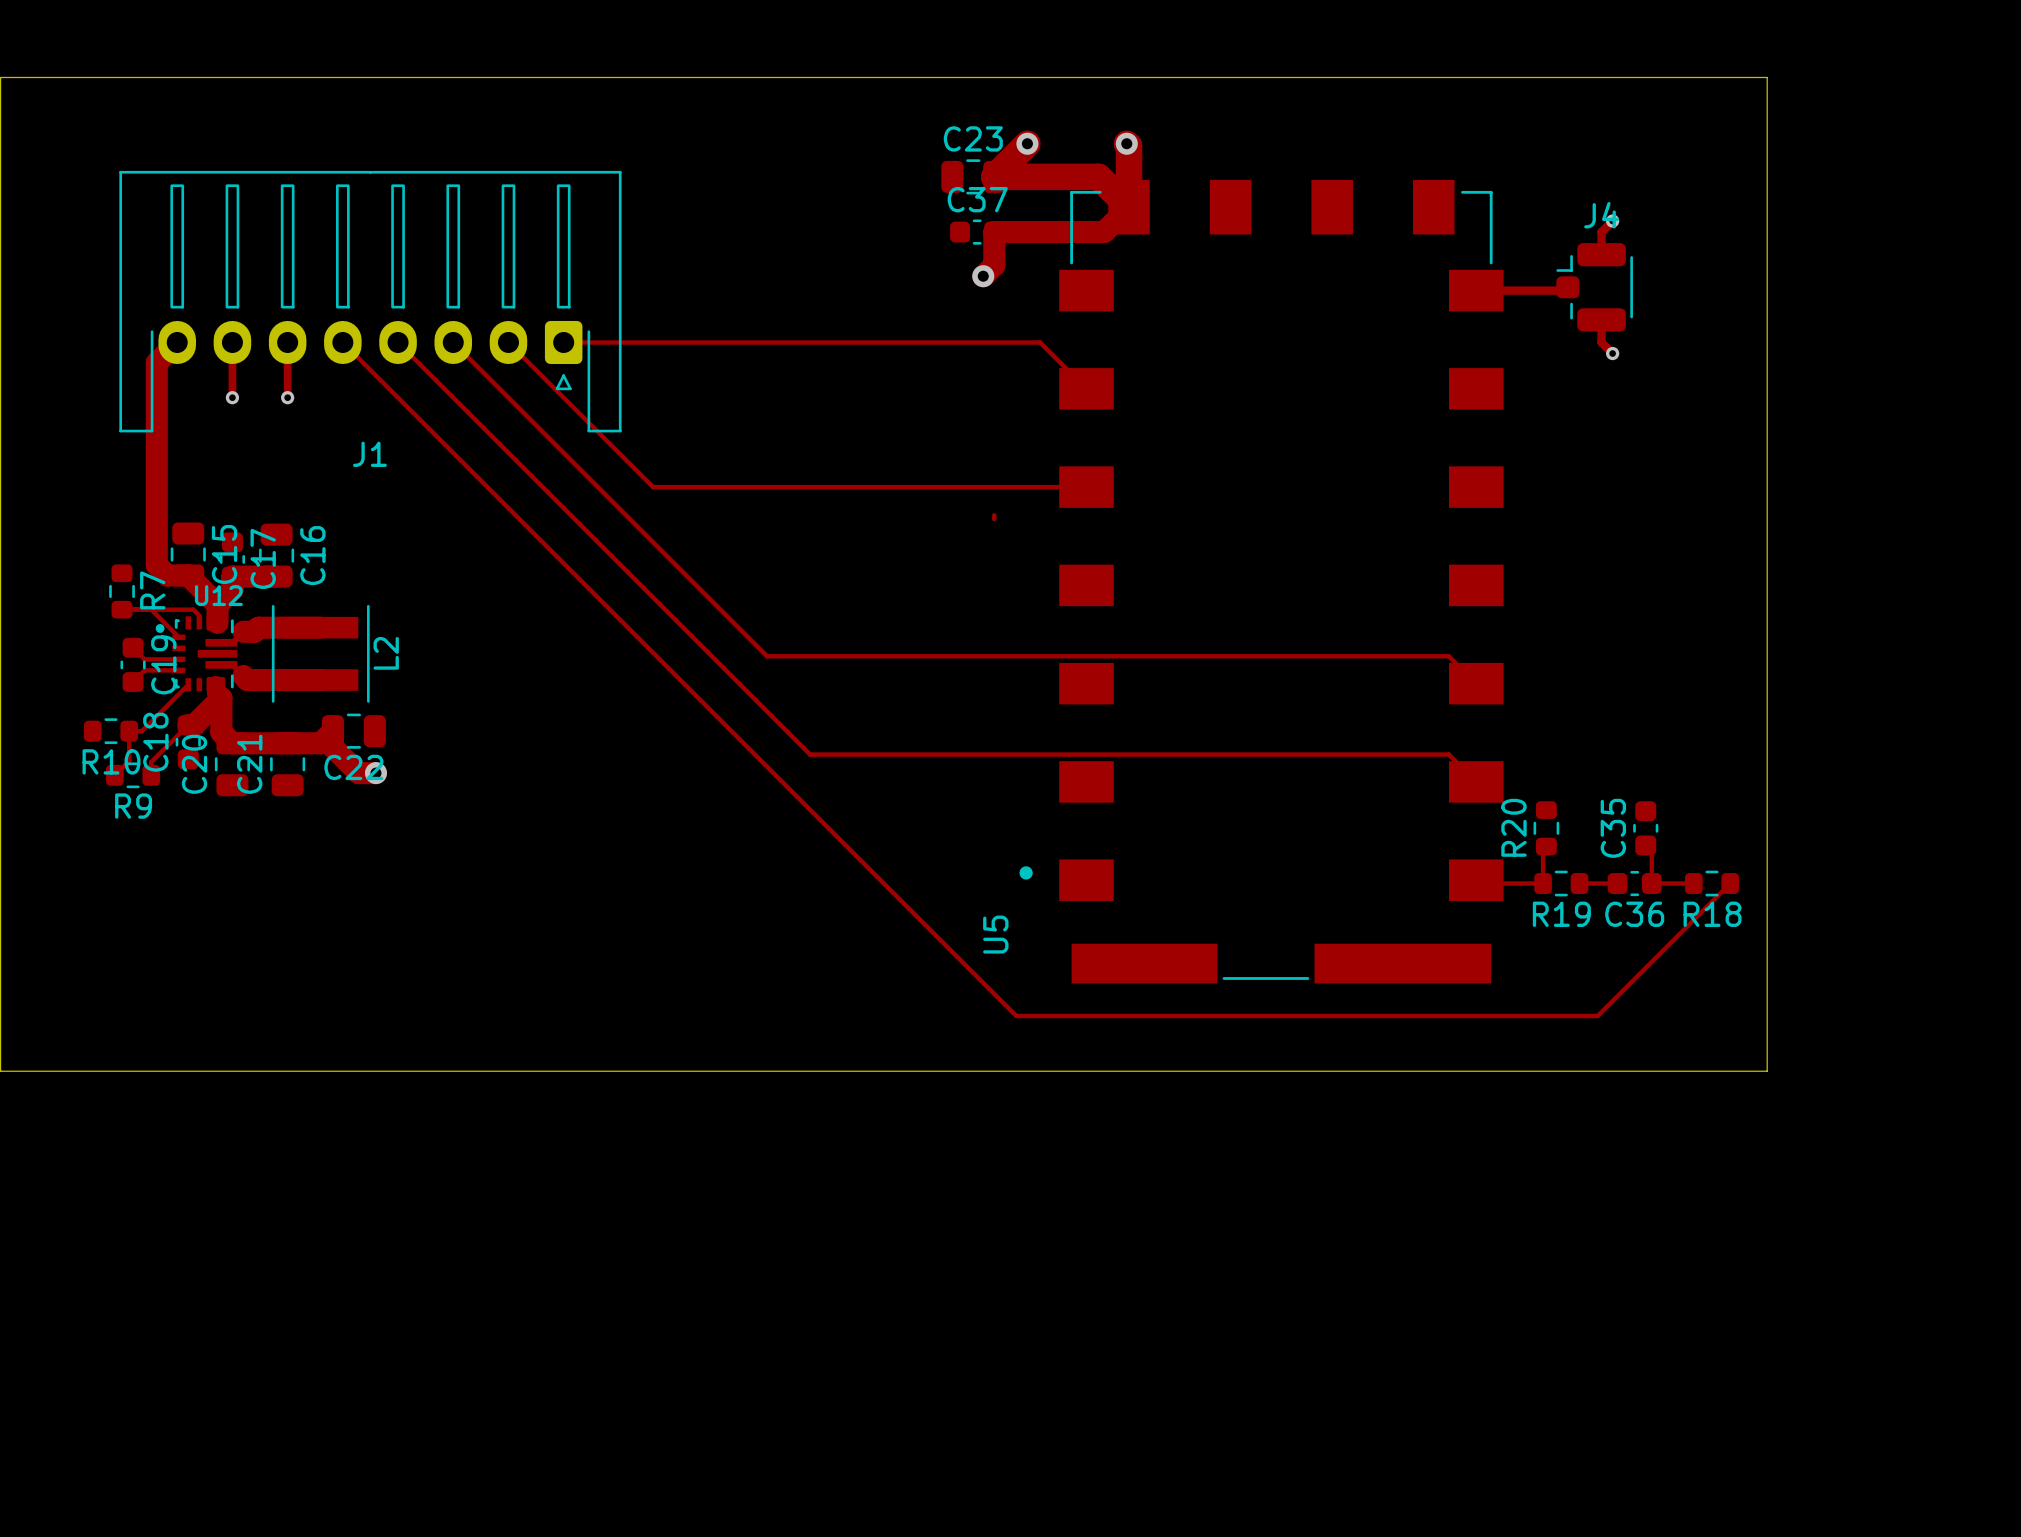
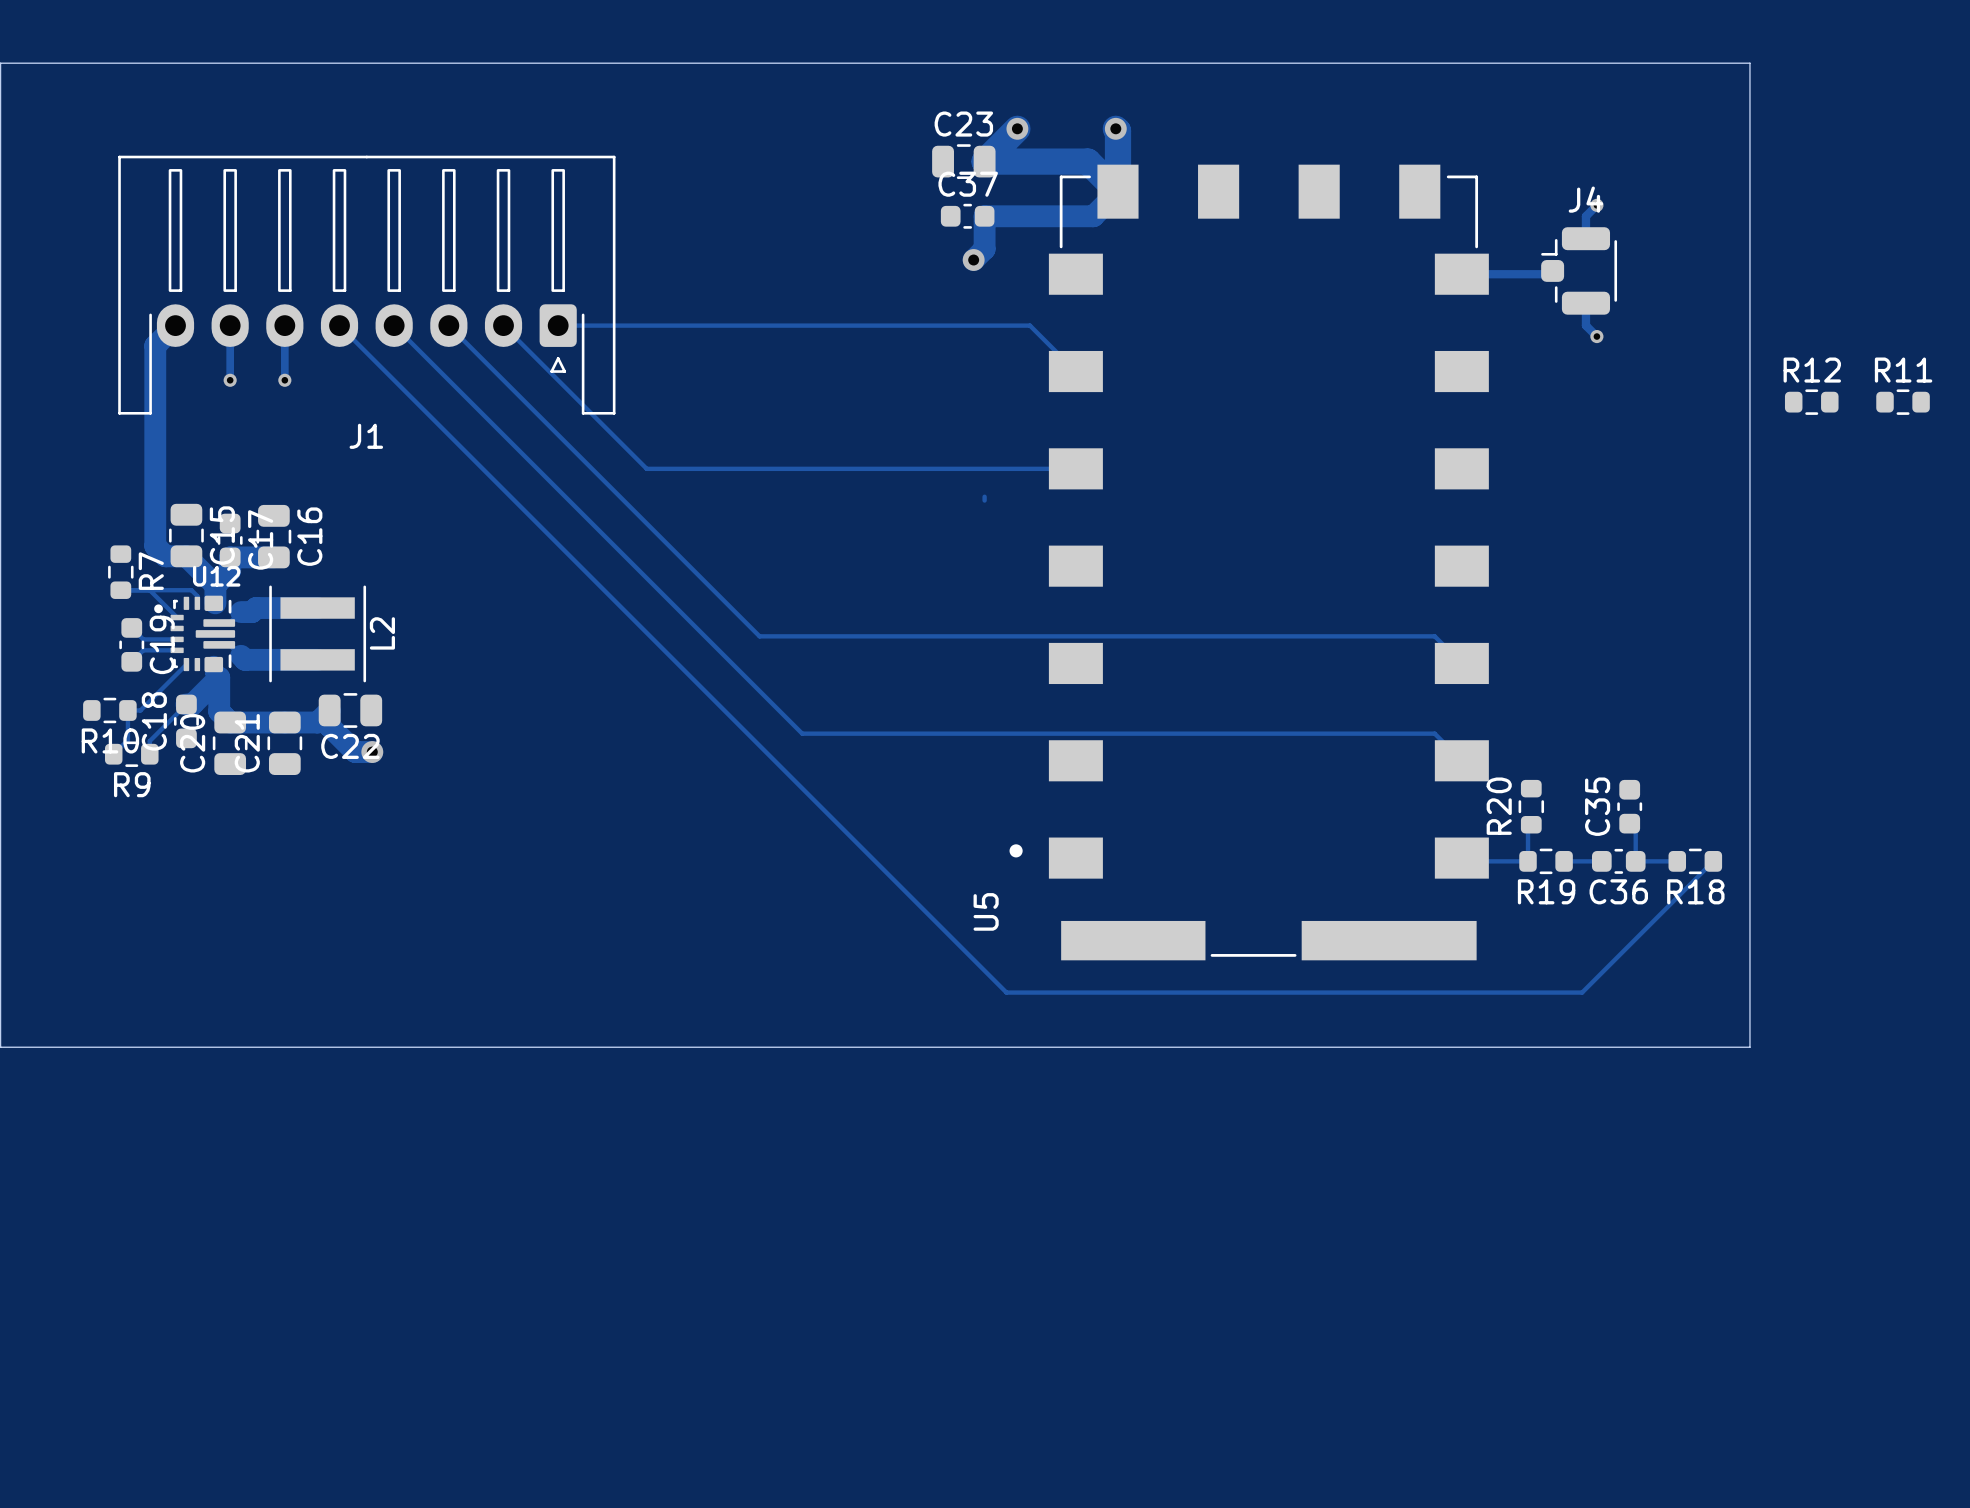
R12: none -> (1811, 402)
R11: none -> (1903, 402)

